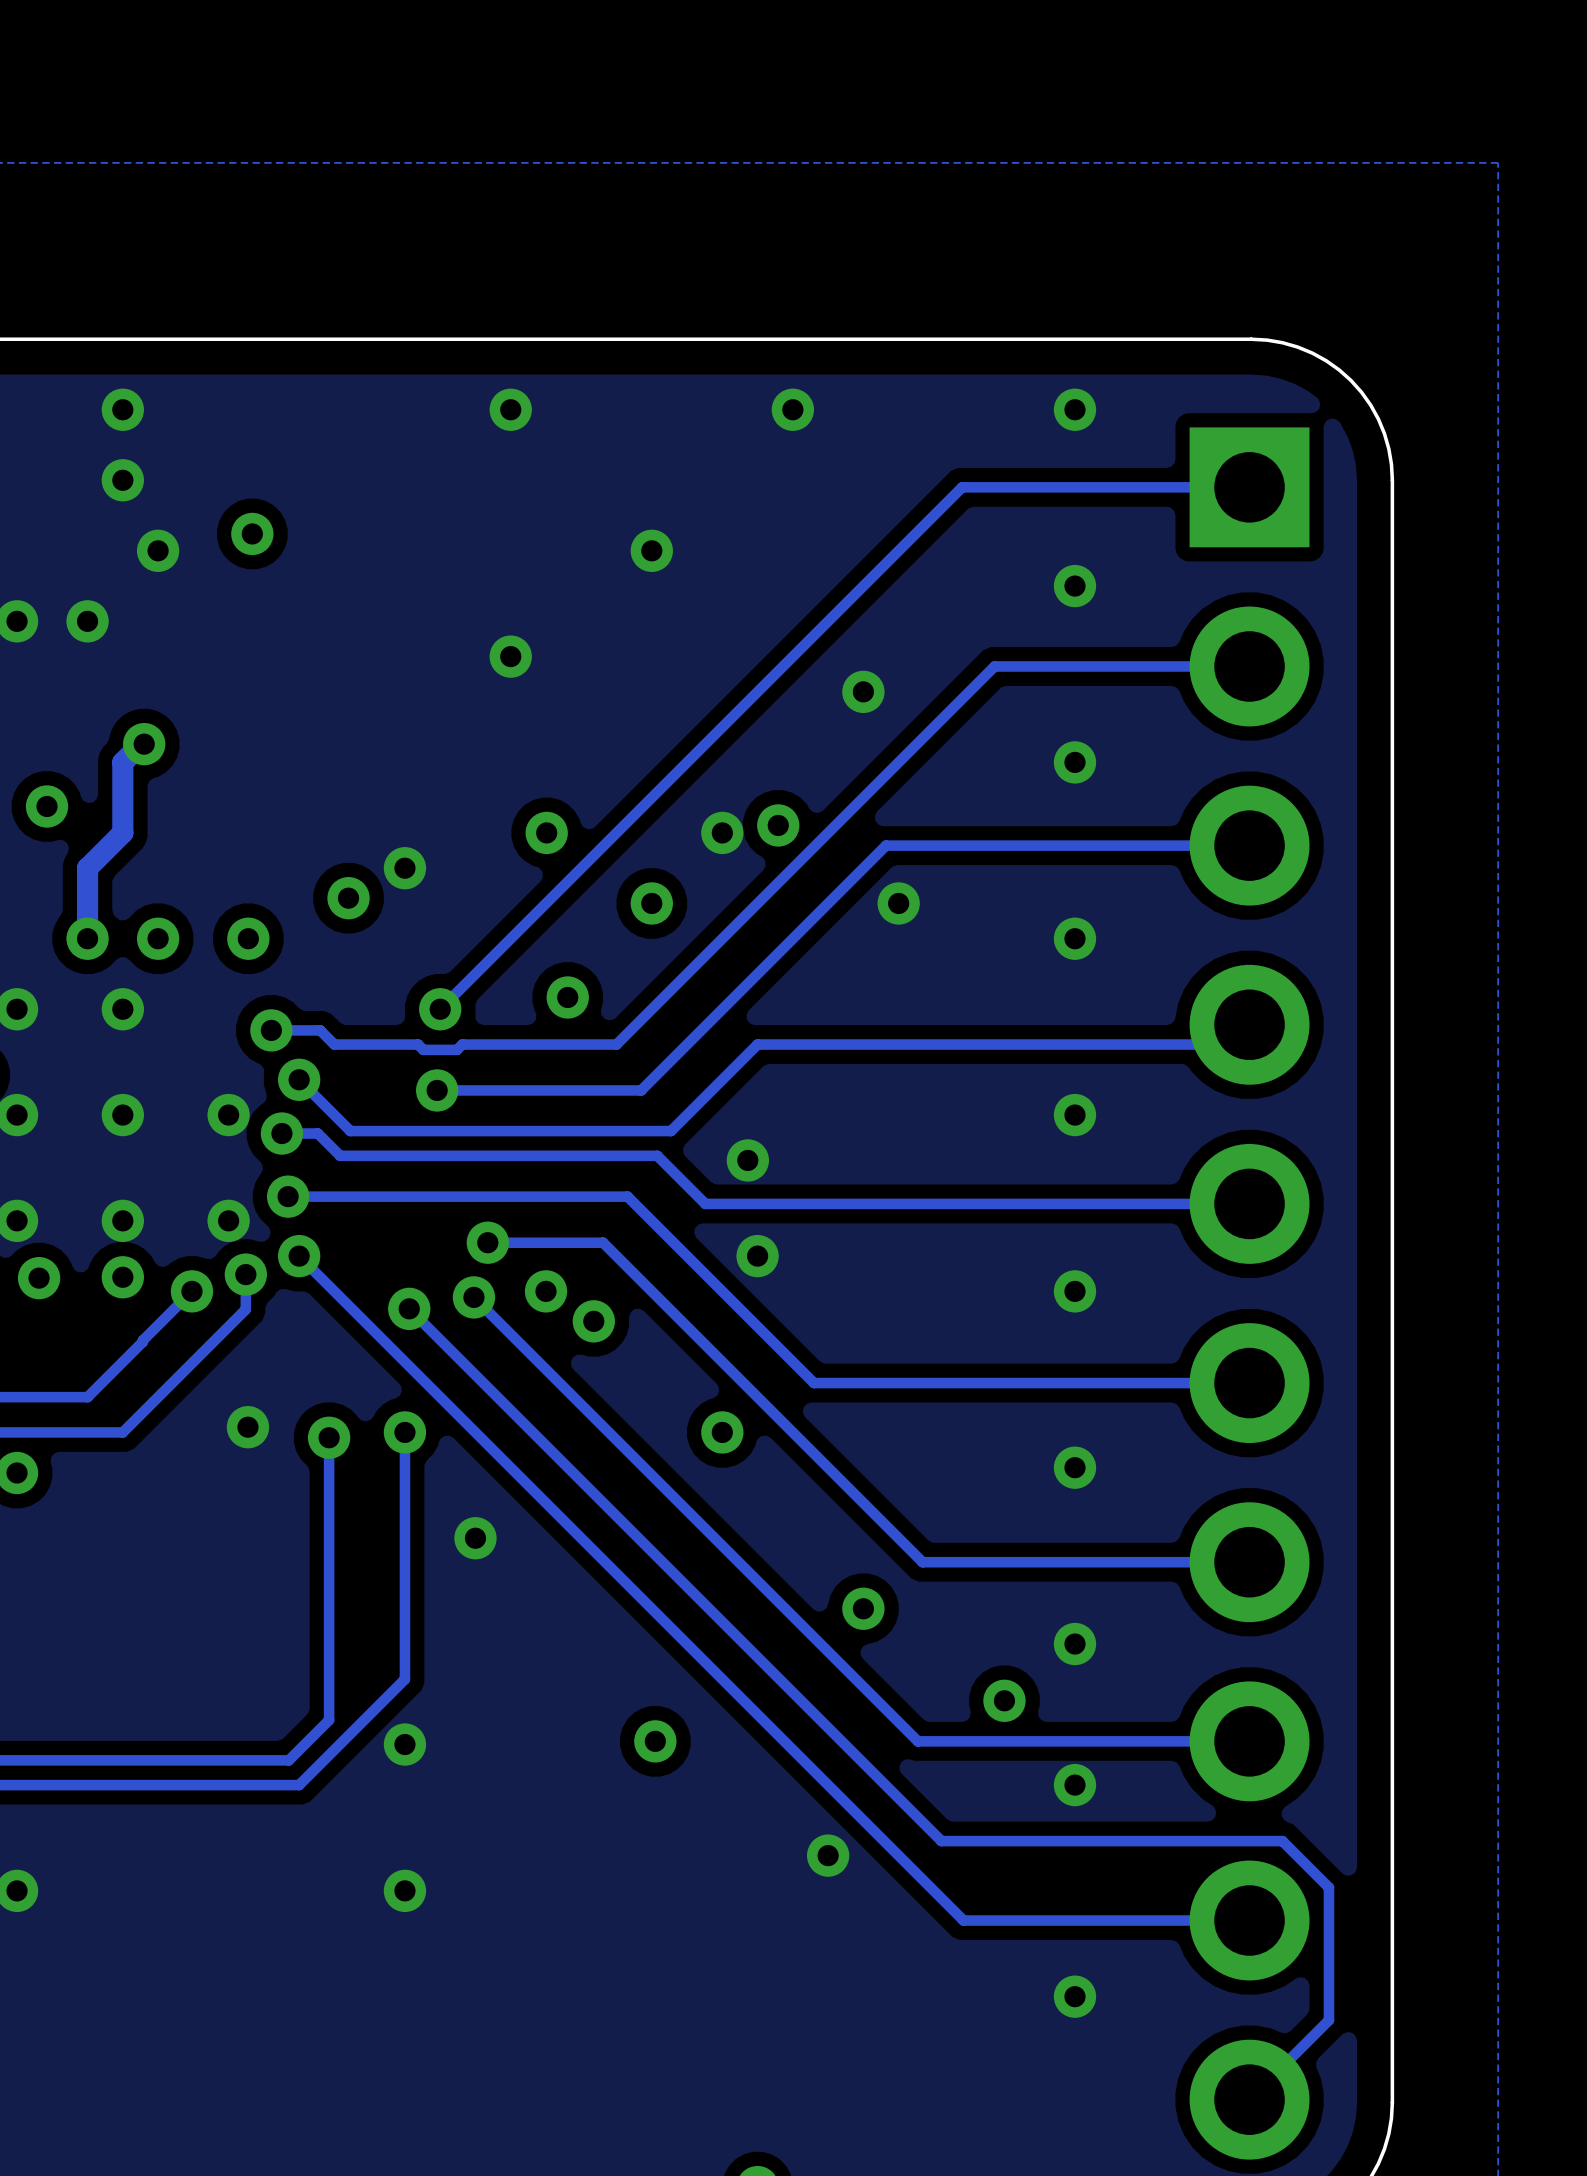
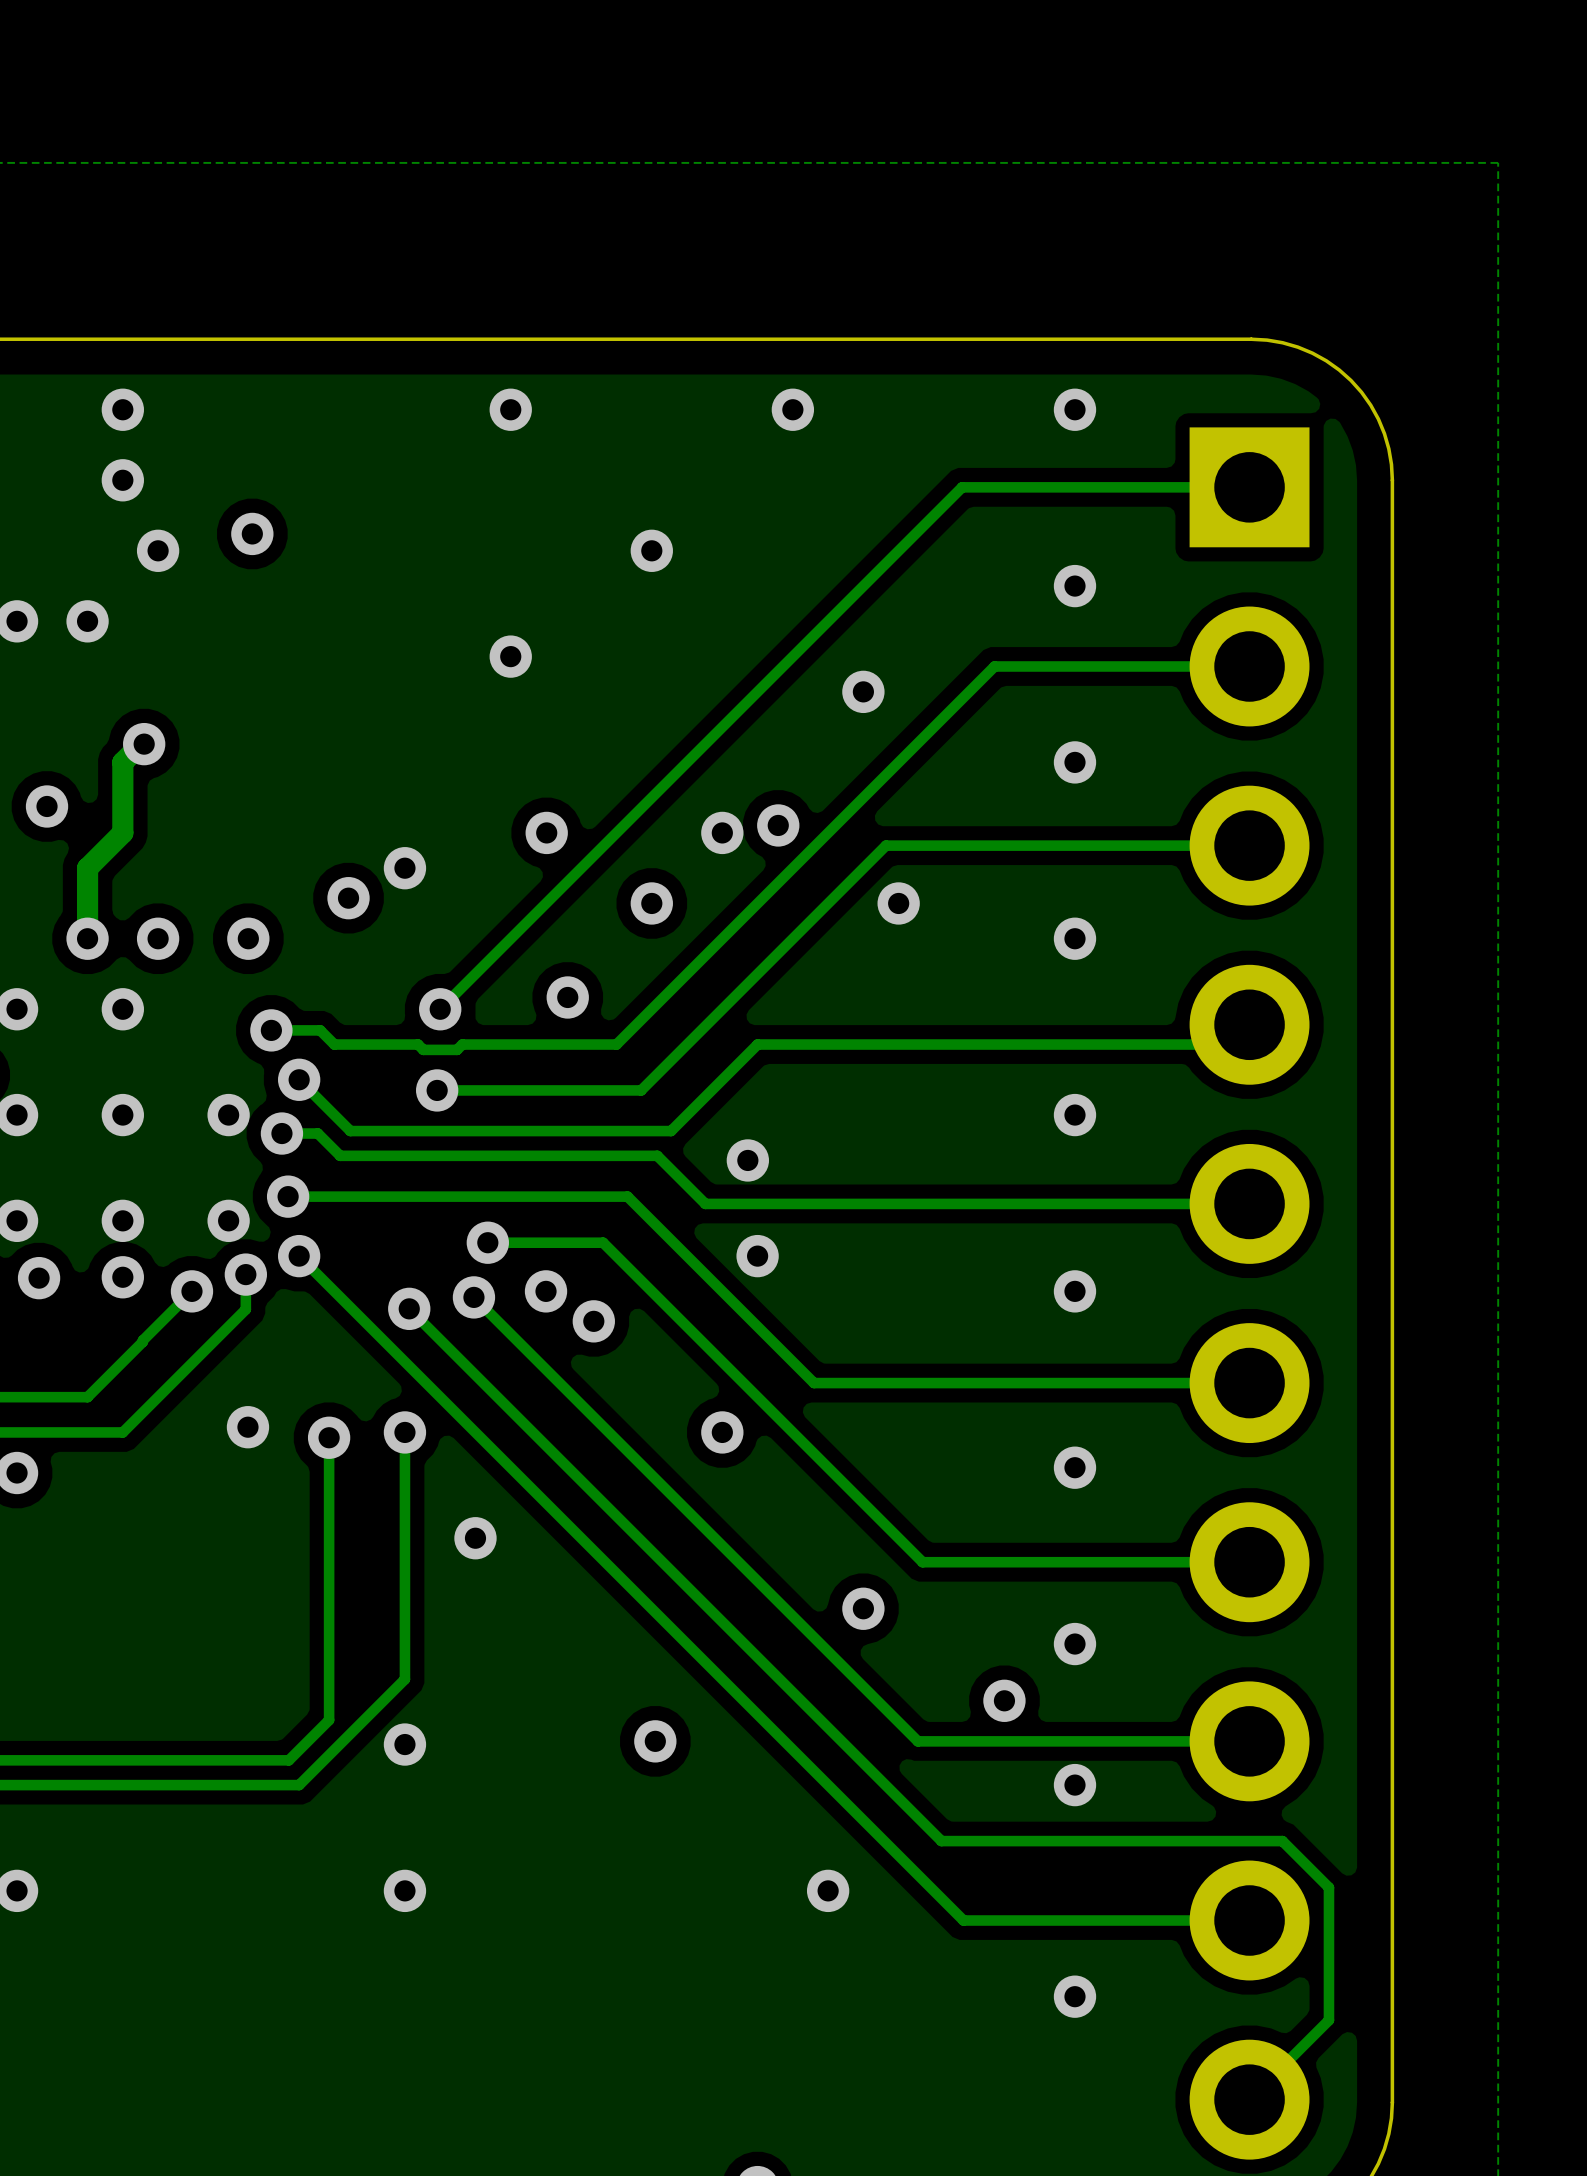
via position: (828, 1855) -> (828, 1890)

